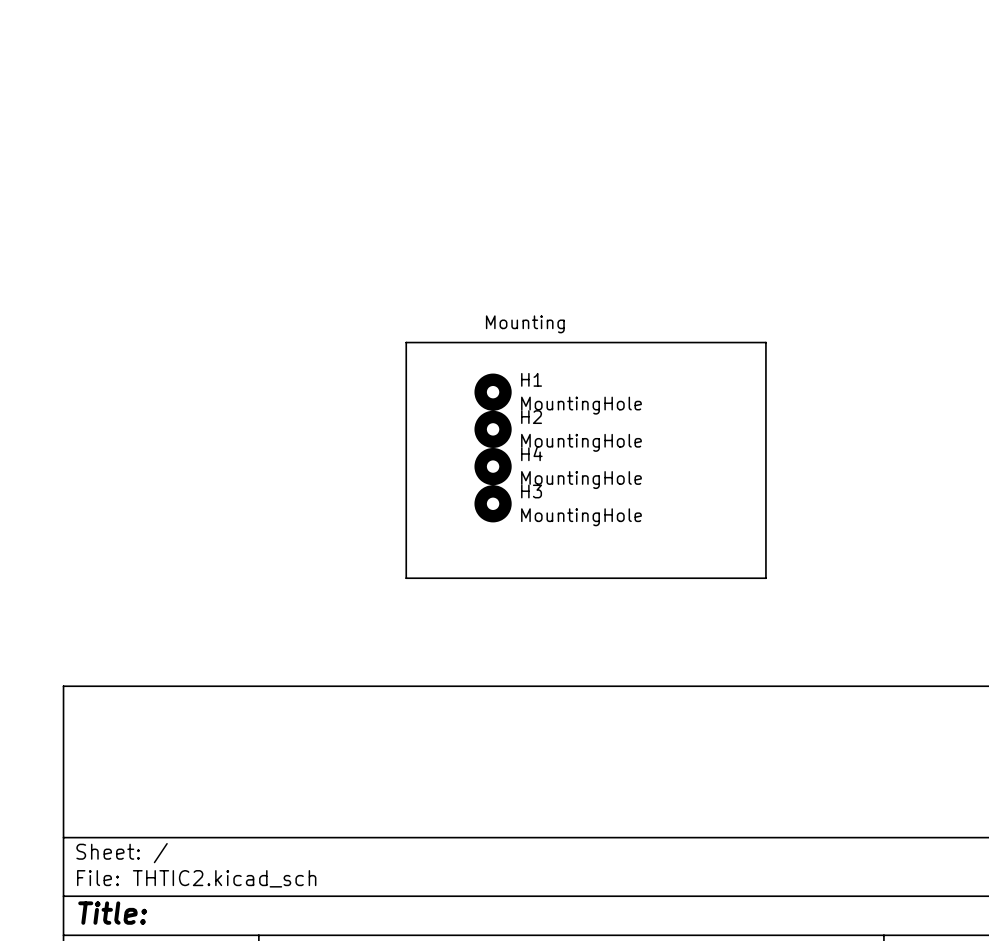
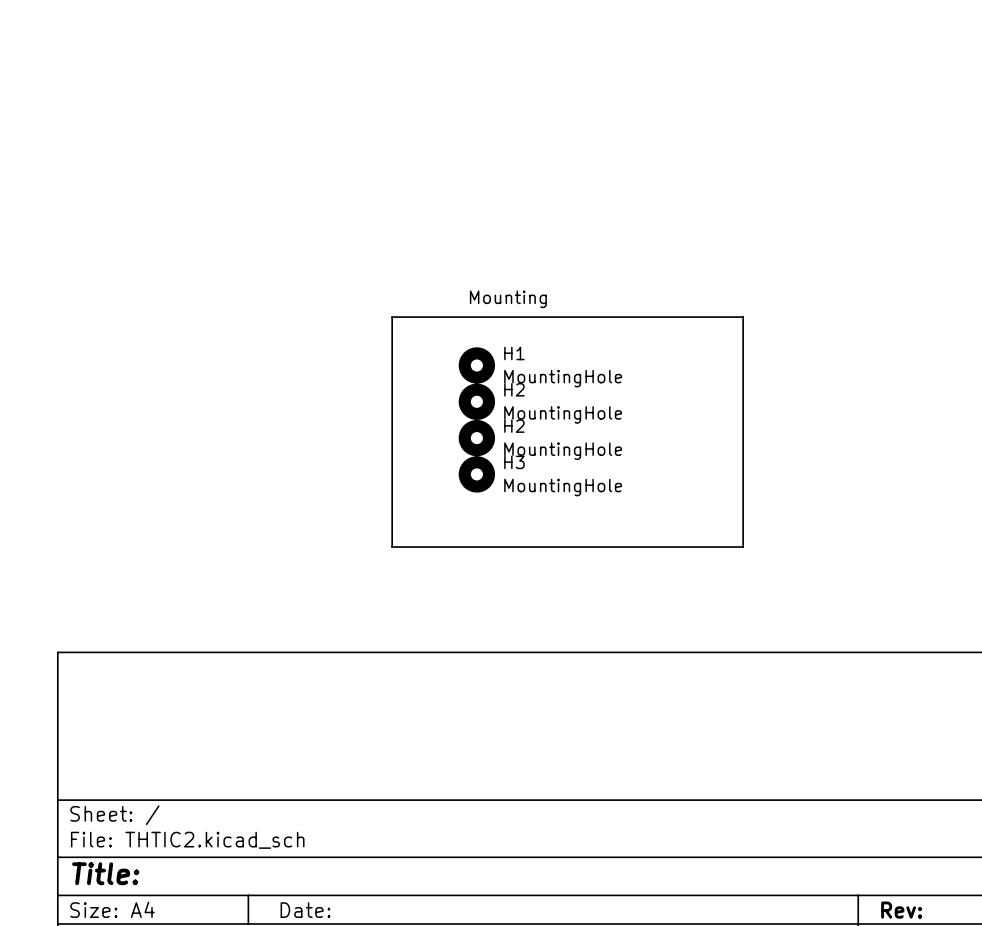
H4 name: H4 (531, 453) -> H2 (514, 426)

